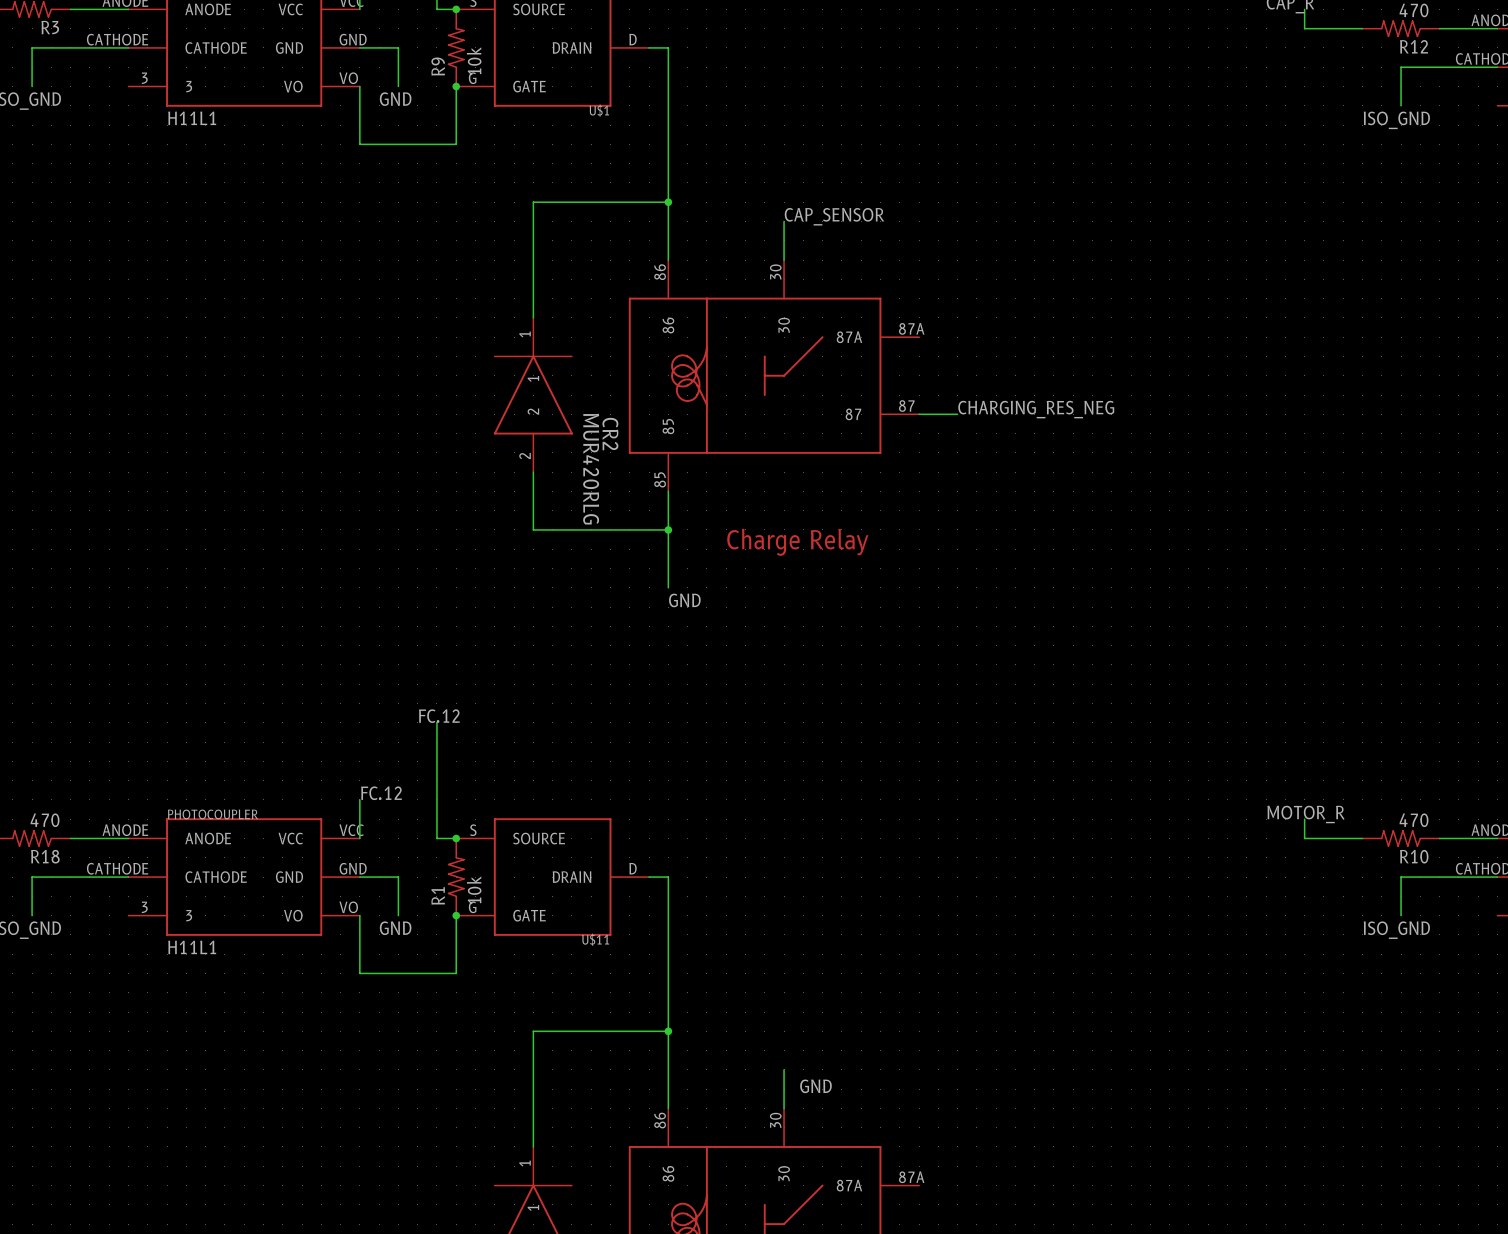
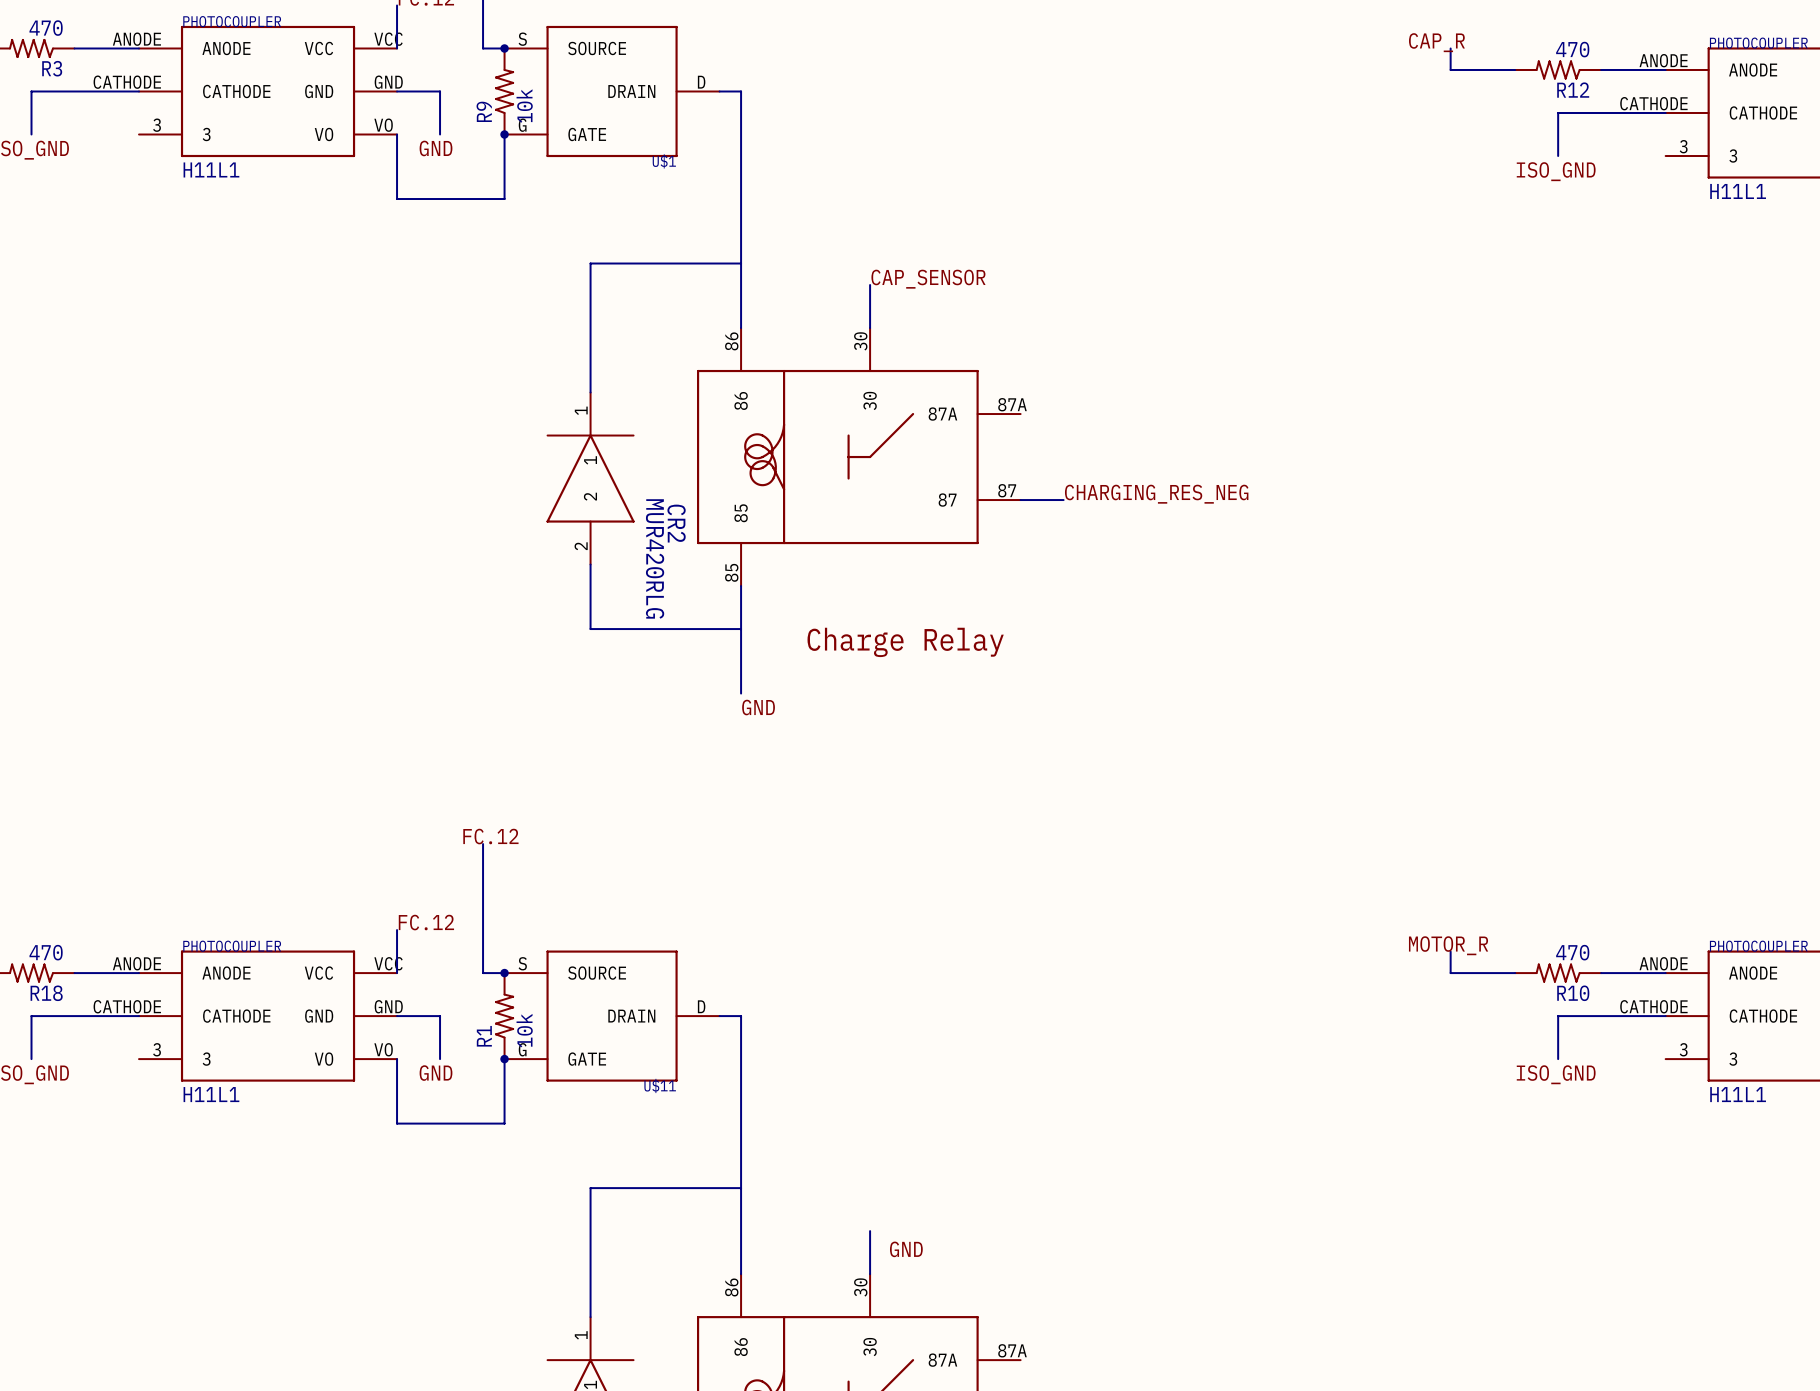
junction: (668, 202) -> none
junction: (668, 529) -> none
junction: (668, 1031) -> none

